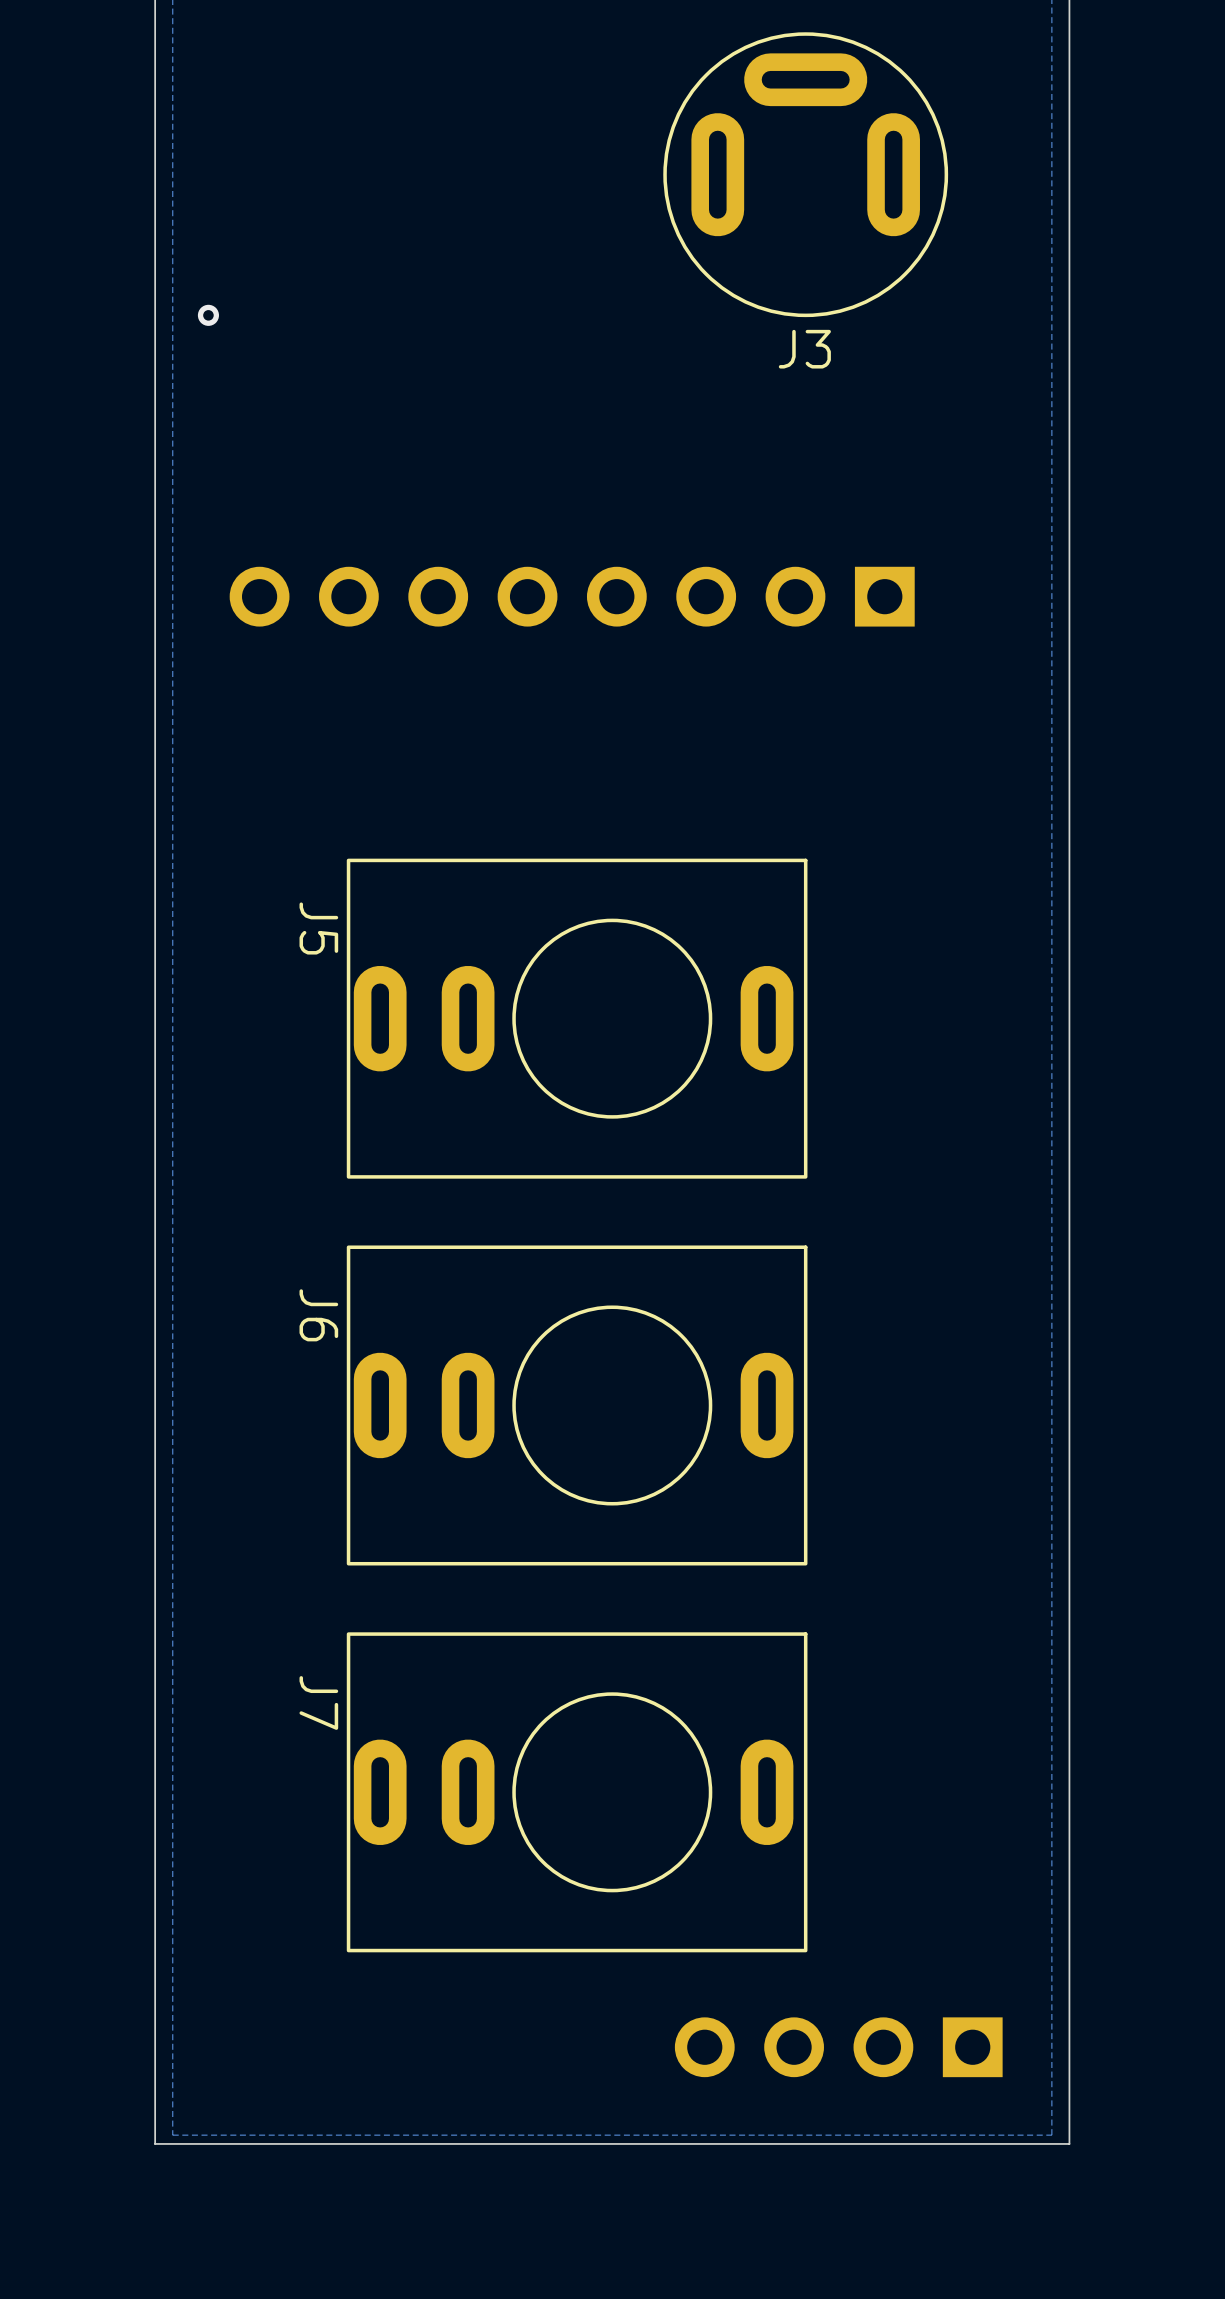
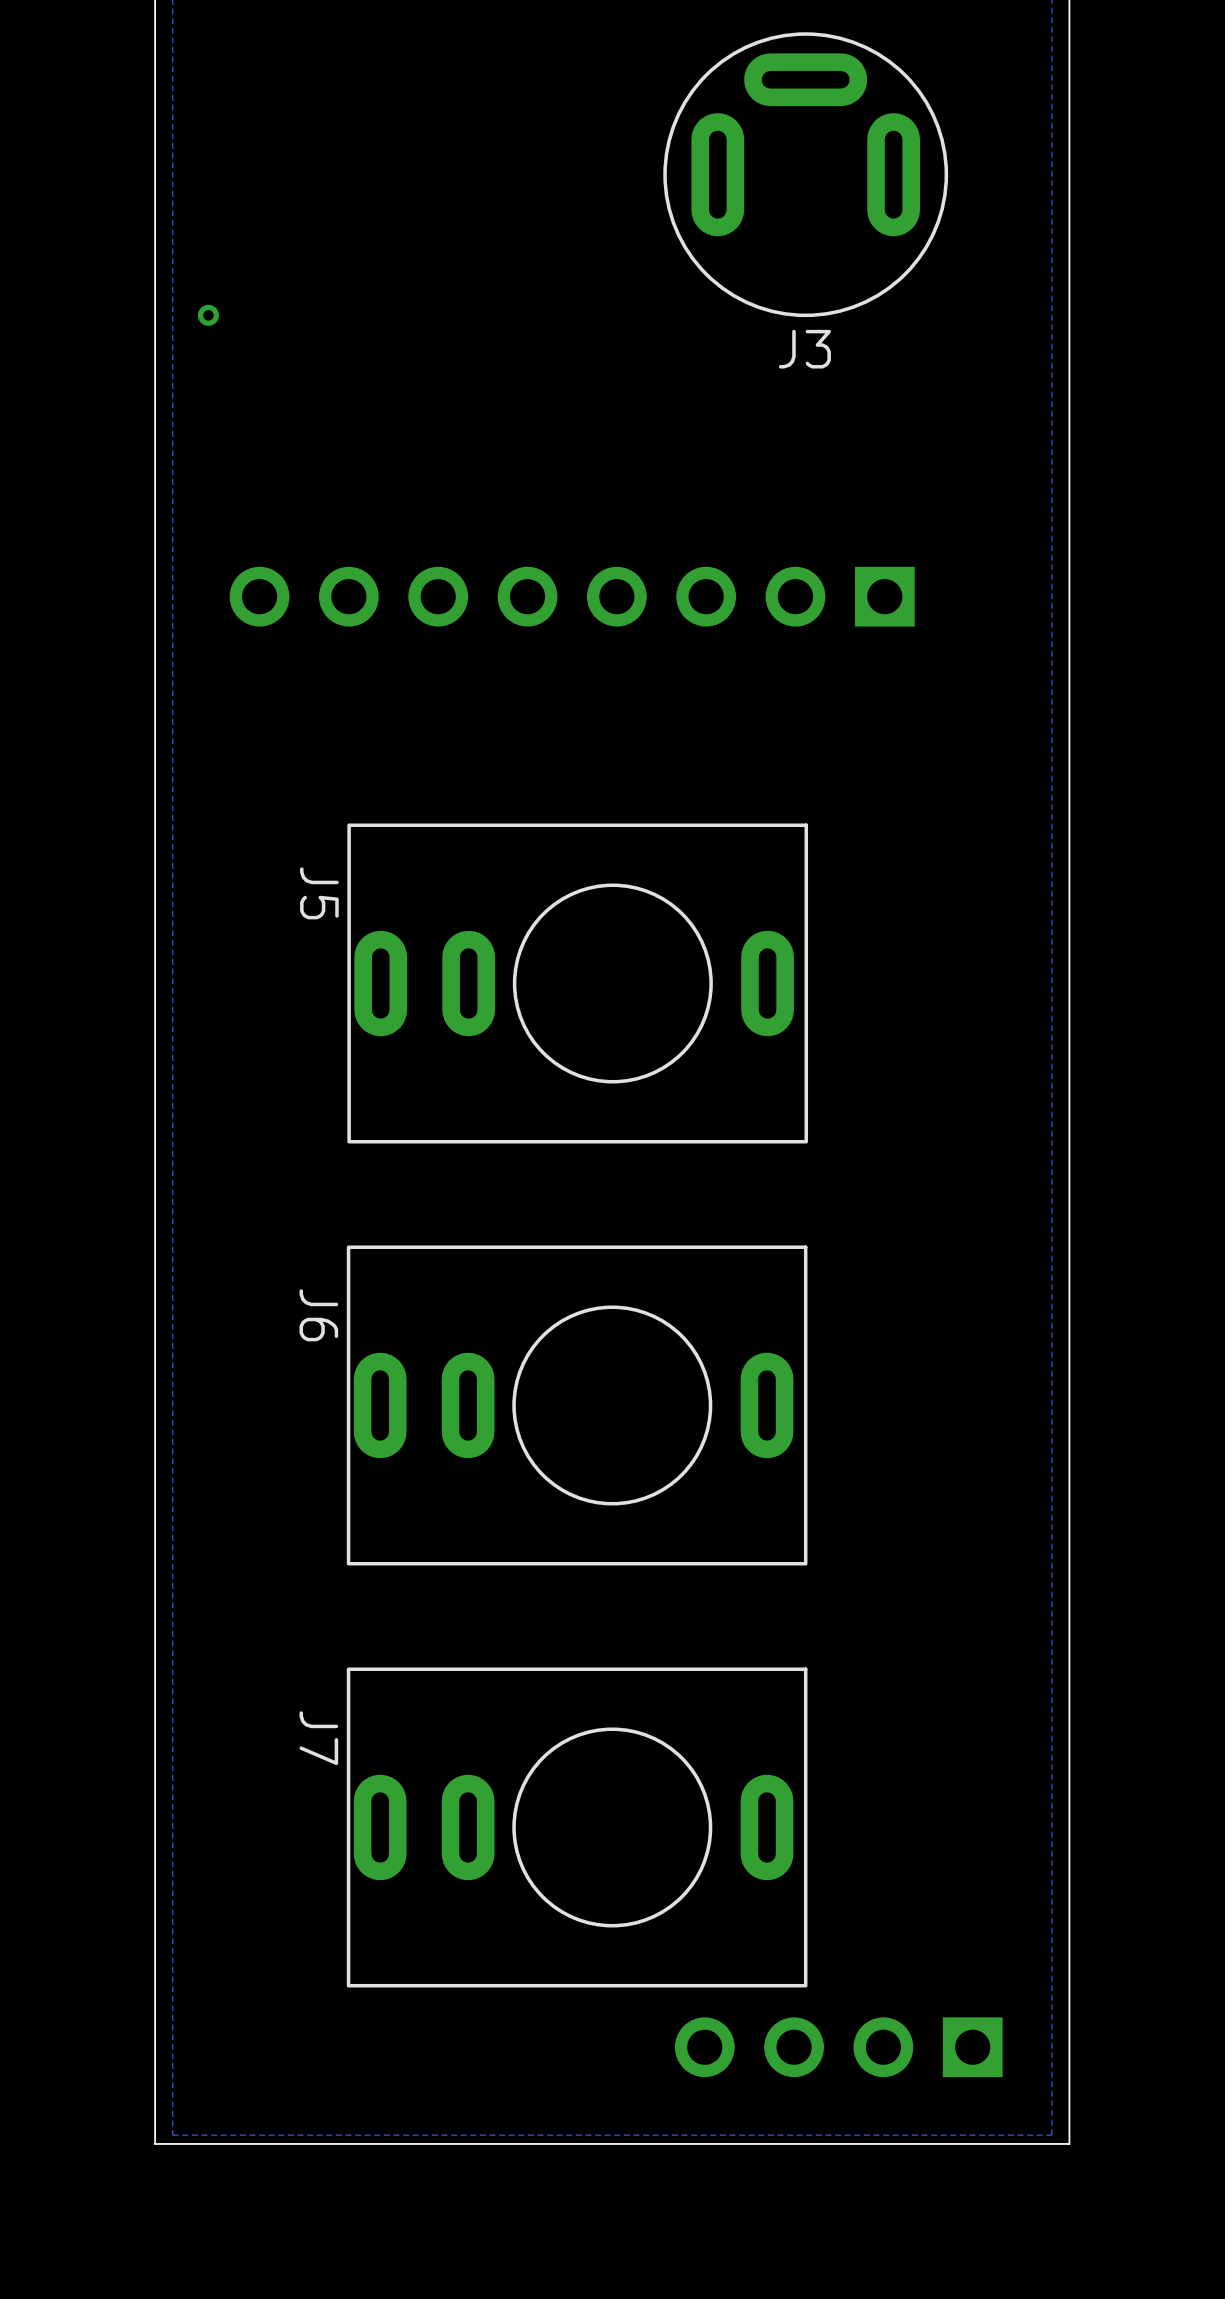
J5 position: (577, 1018) -> (577, 983)
J7 position: (577, 1792) -> (577, 1827)

